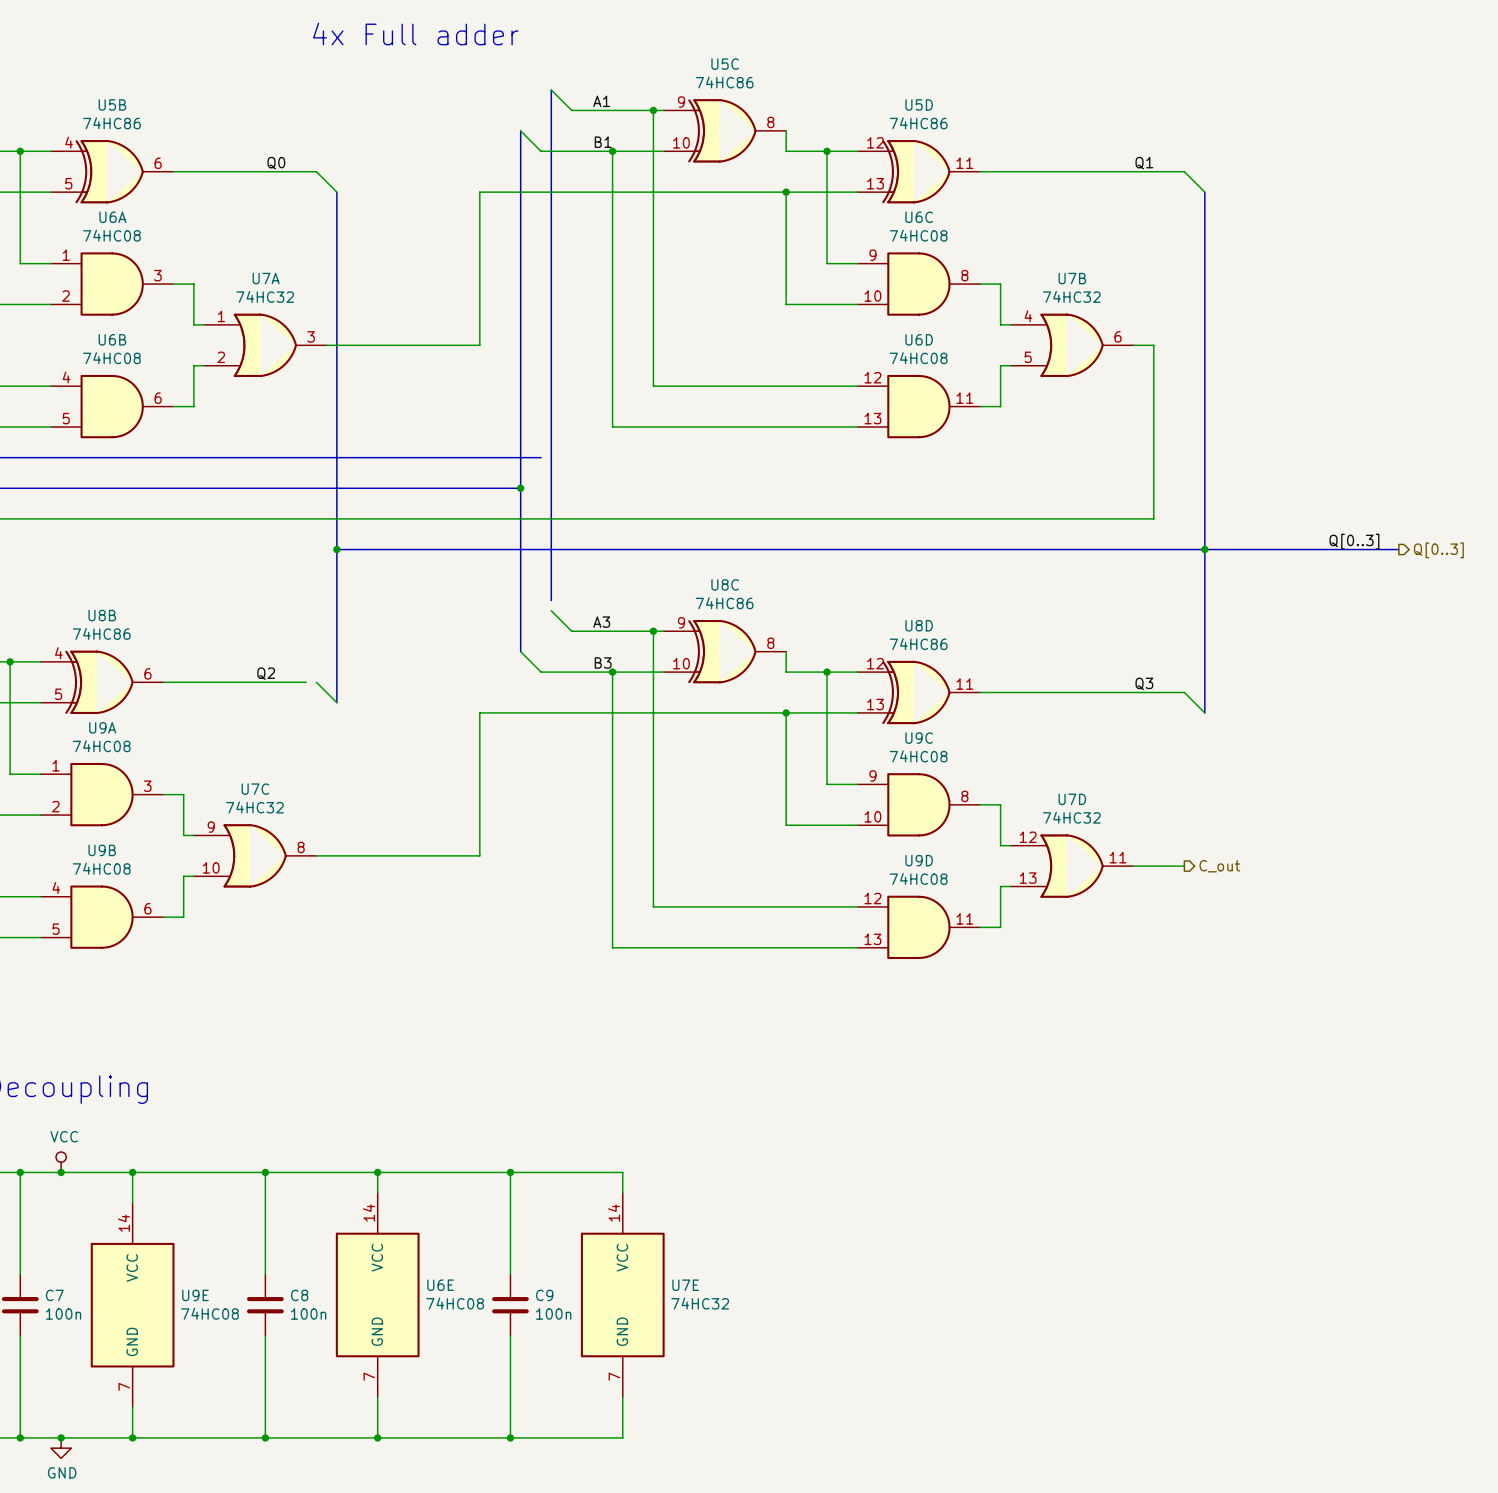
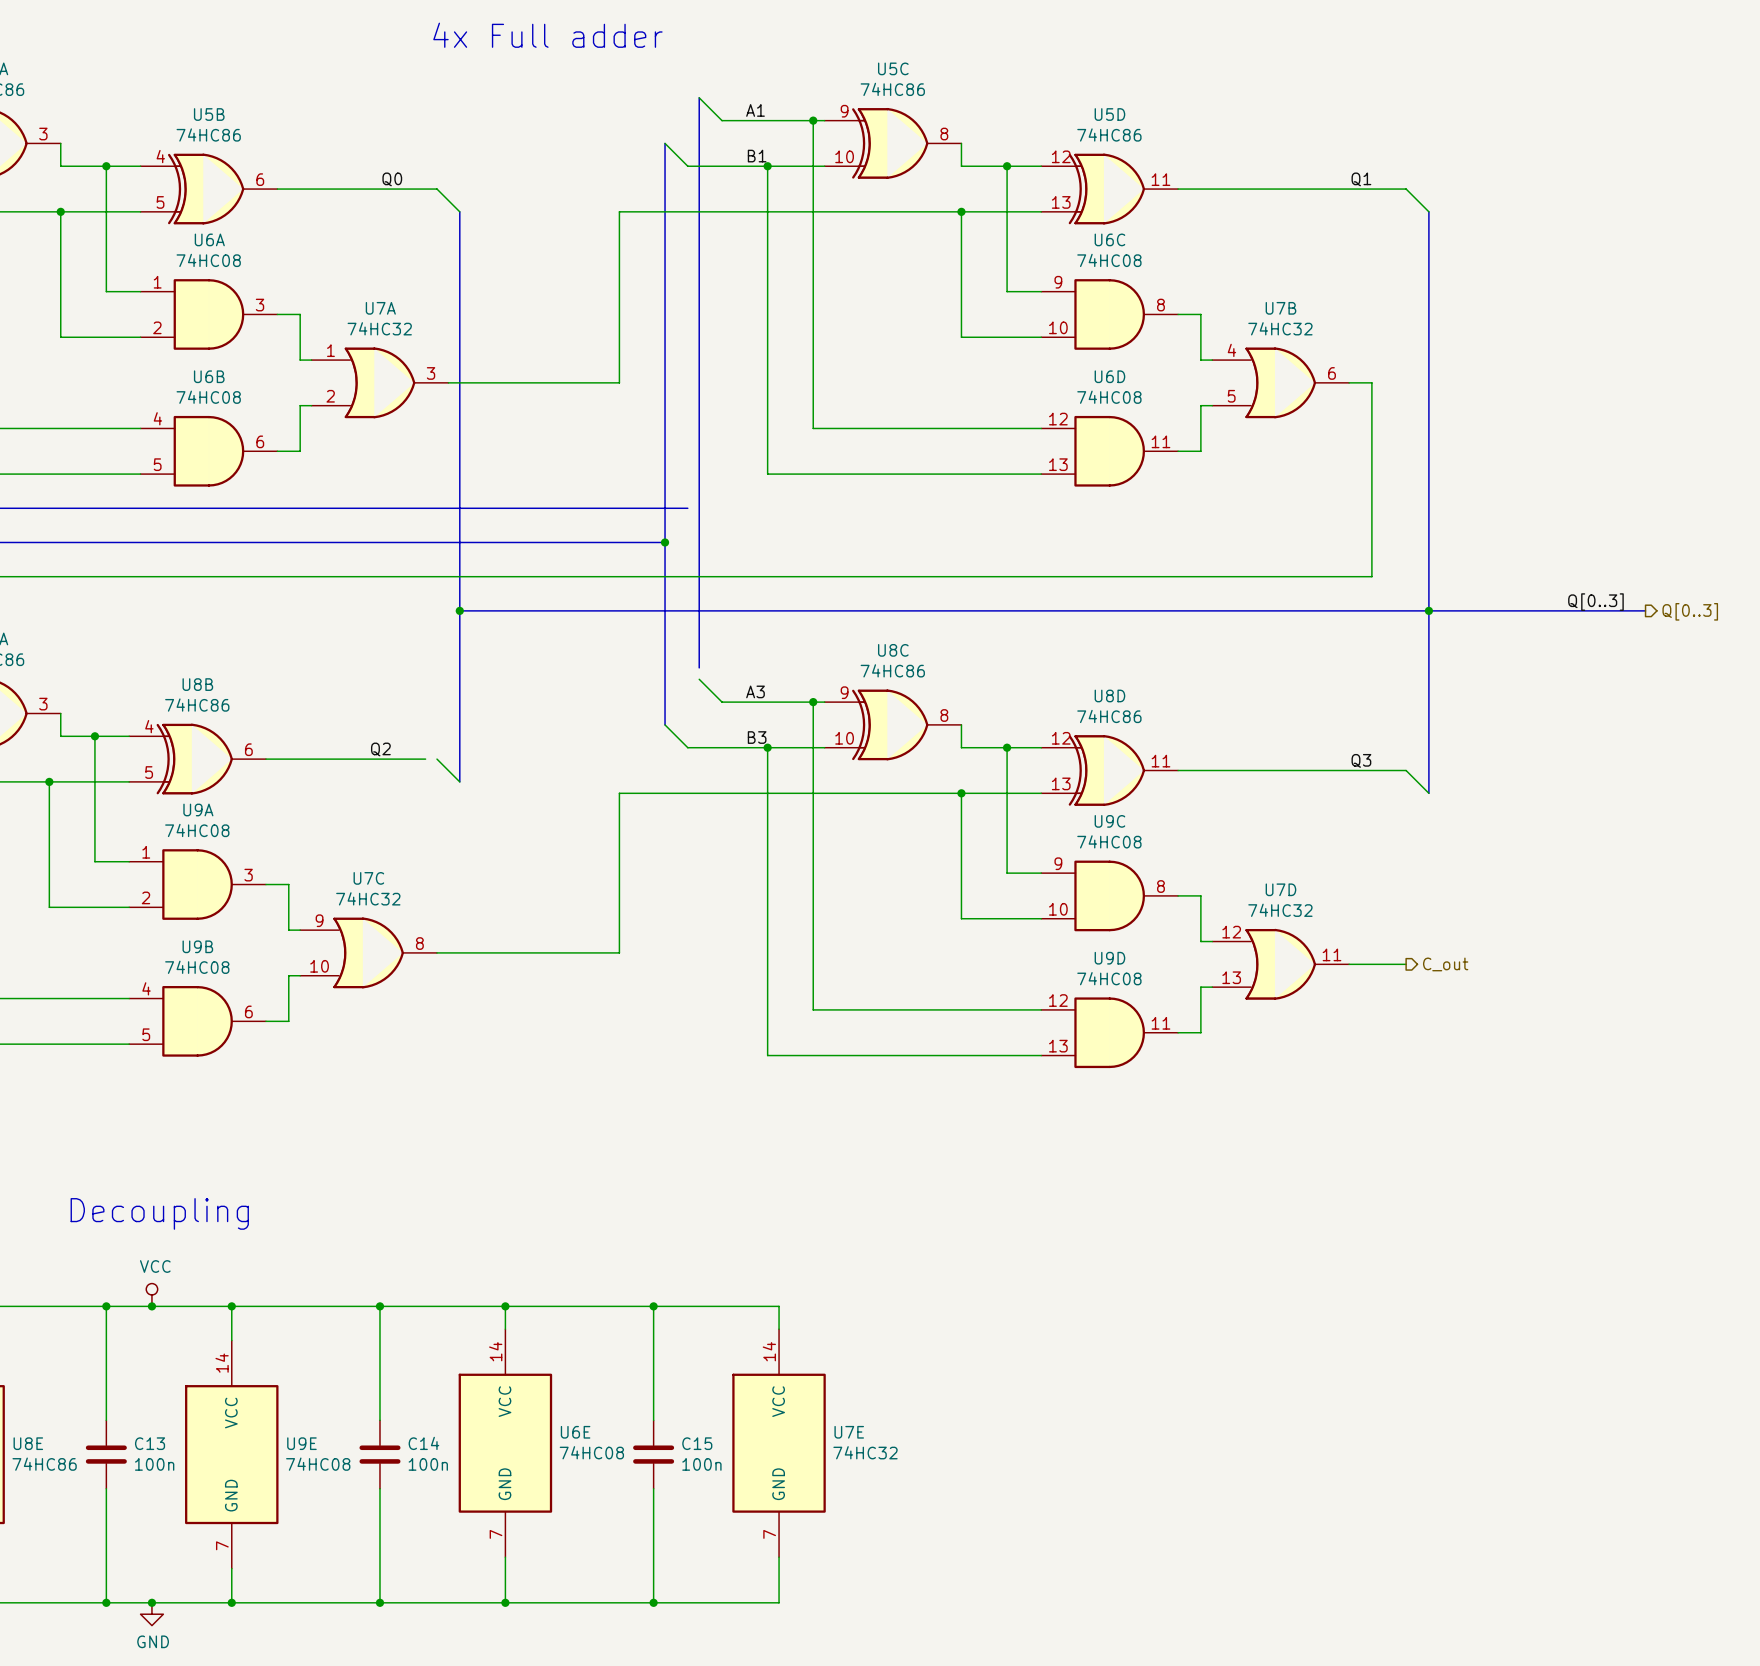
C7 name: C7 (54, 1295) -> C13 (150, 1443)
C8 name: C8 (299, 1295) -> C14 (423, 1443)
C9 name: C9 (544, 1295) -> C15 (697, 1443)

